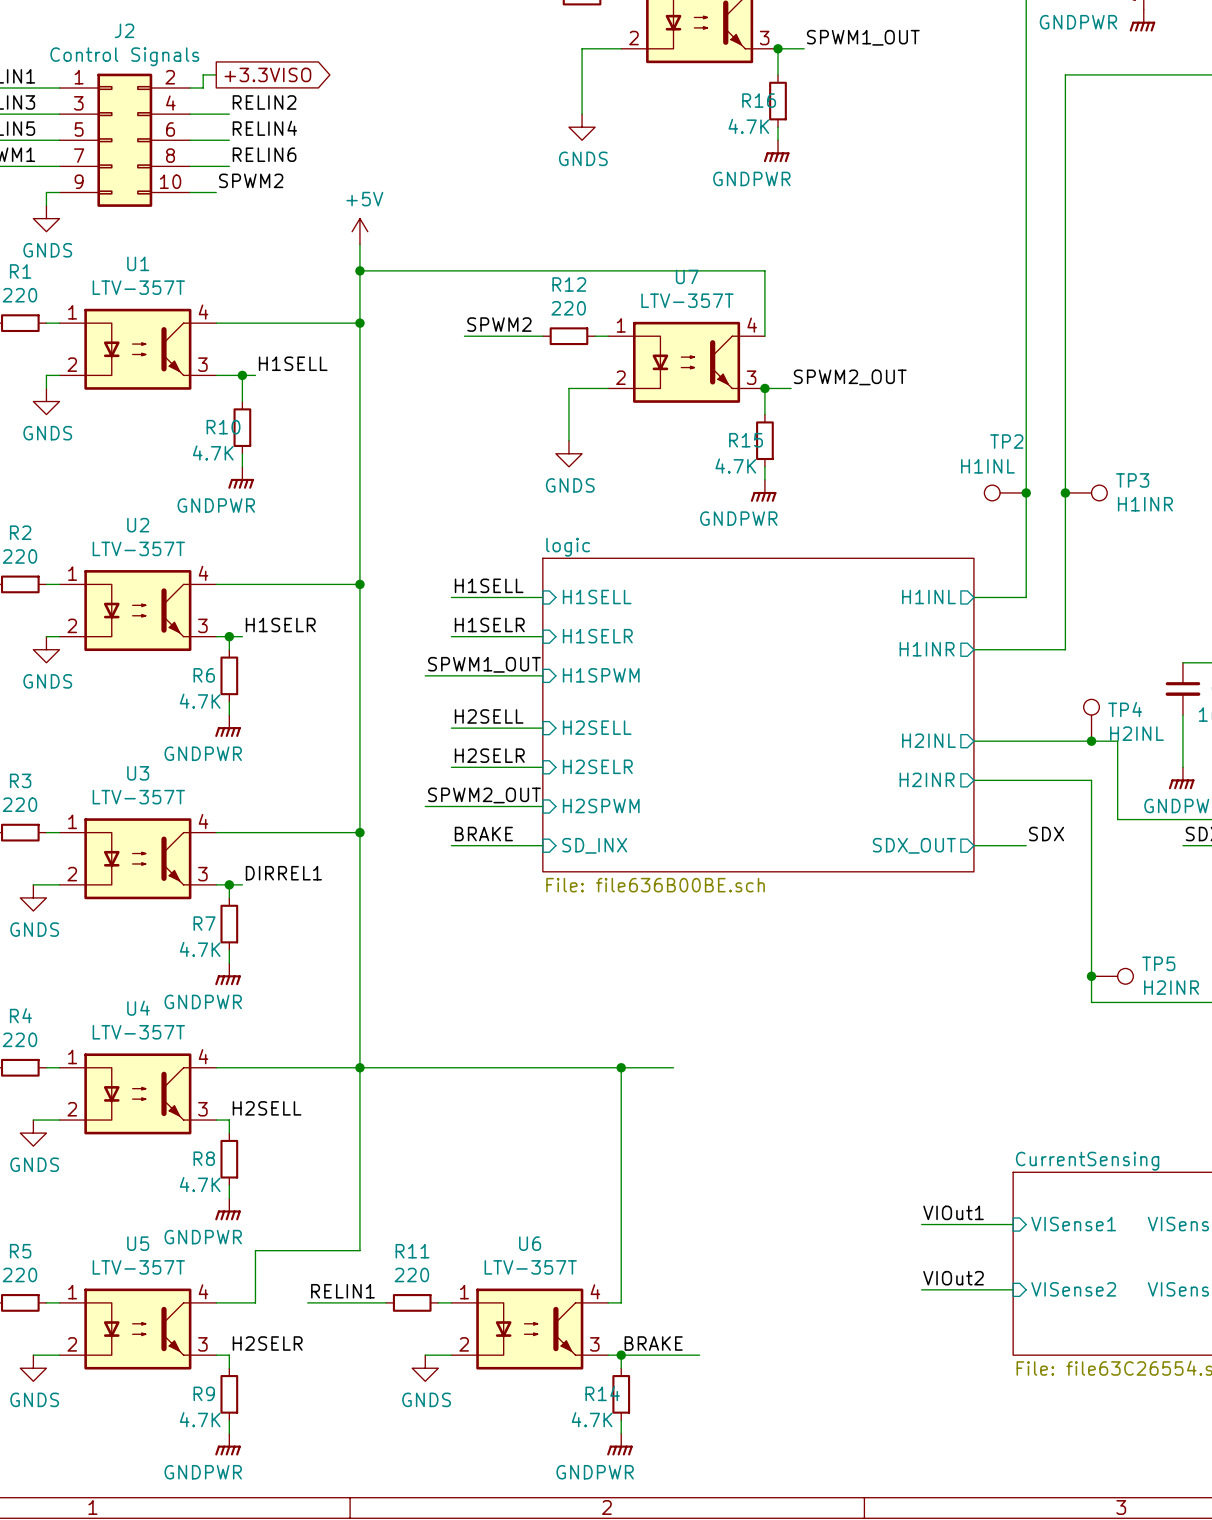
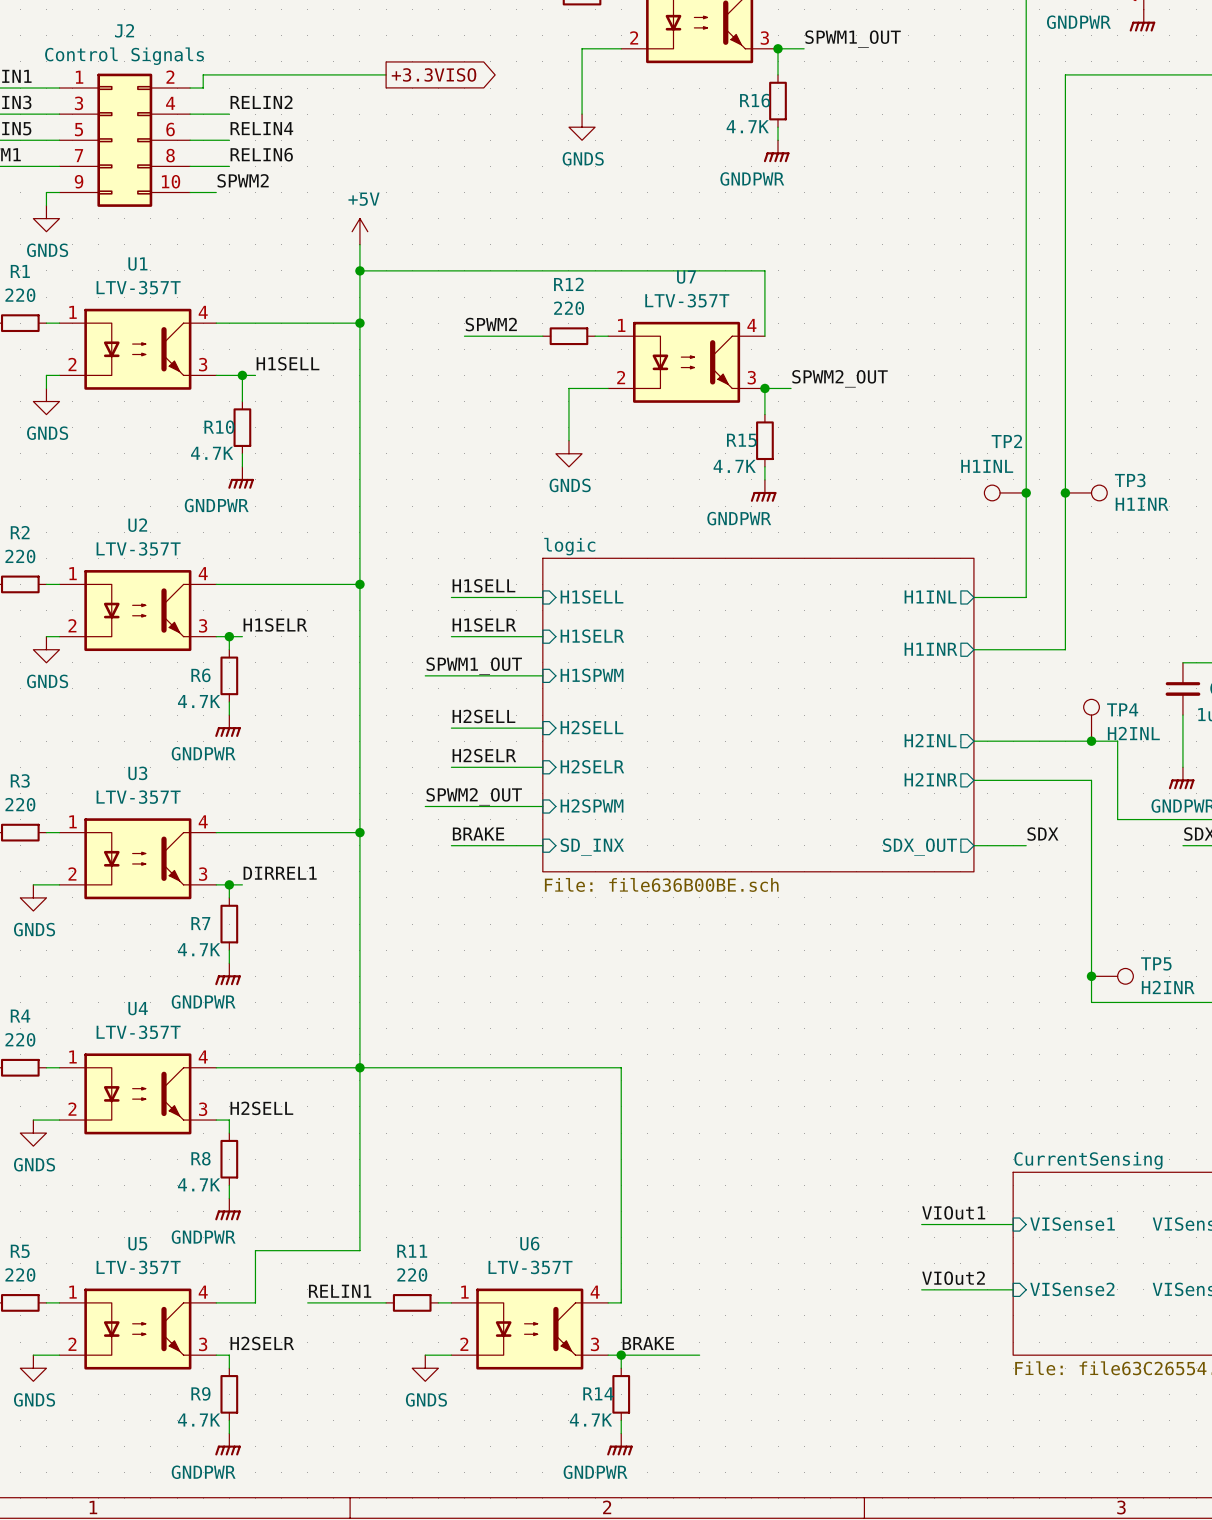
wire: none -> (216, 74) (386, 74)
global label position: +3.3VISO (267, 74) -> +3.3VISO (434, 74)
wire: (621, 1067) (673, 1067) -> none
junction: (621, 1067) -> none

